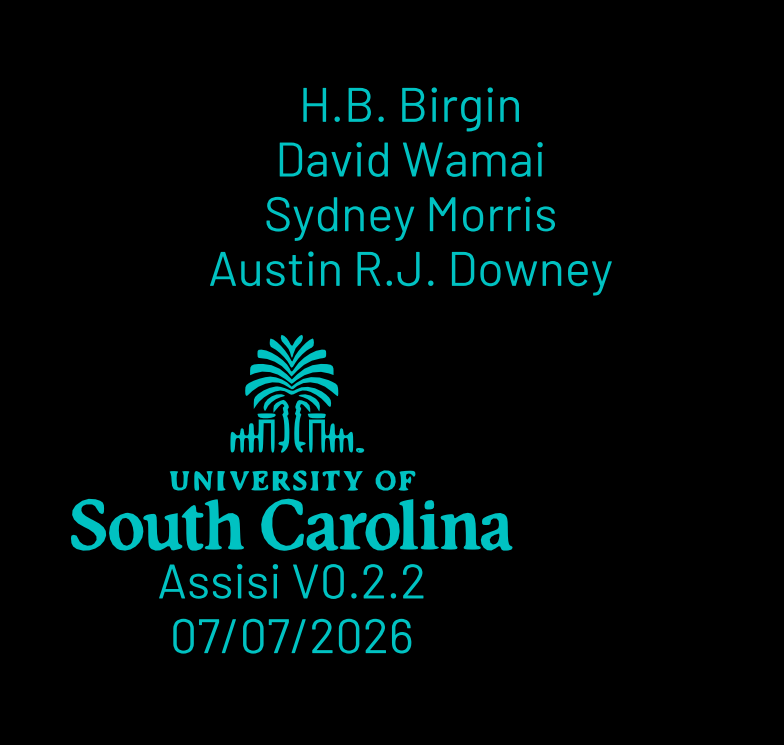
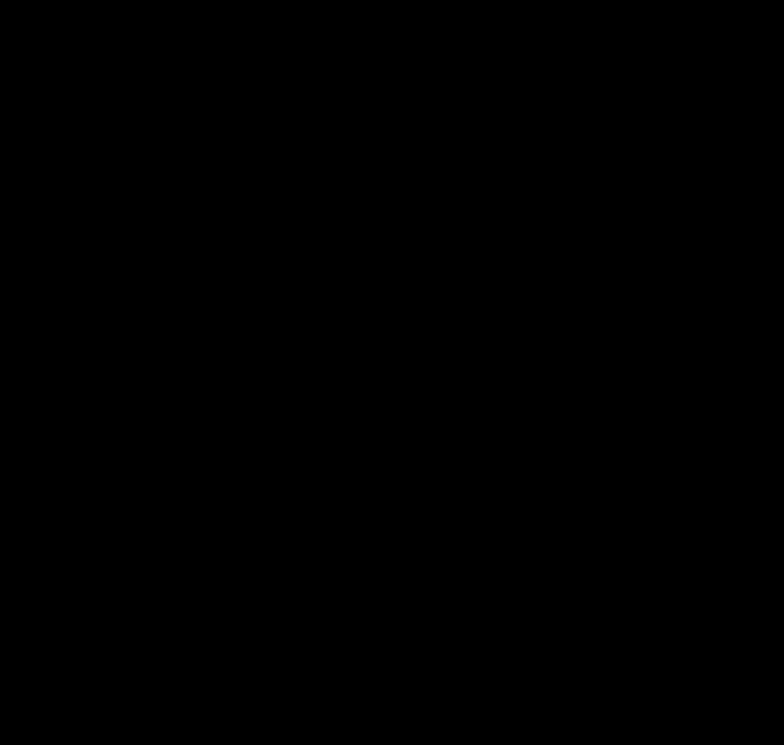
text: H.B. Birgin (411, 109) -> none
text: David Wamai (411, 159) -> none
text: Sydney Morris (410, 218) -> none
text: Austin R.J. Downey (410, 273) -> none
drawing: [70, 334, 513, 551] -> none
text: Assisi V0.2.2 (291, 581) -> none
text: 07/07/2026 (292, 636) -> none

